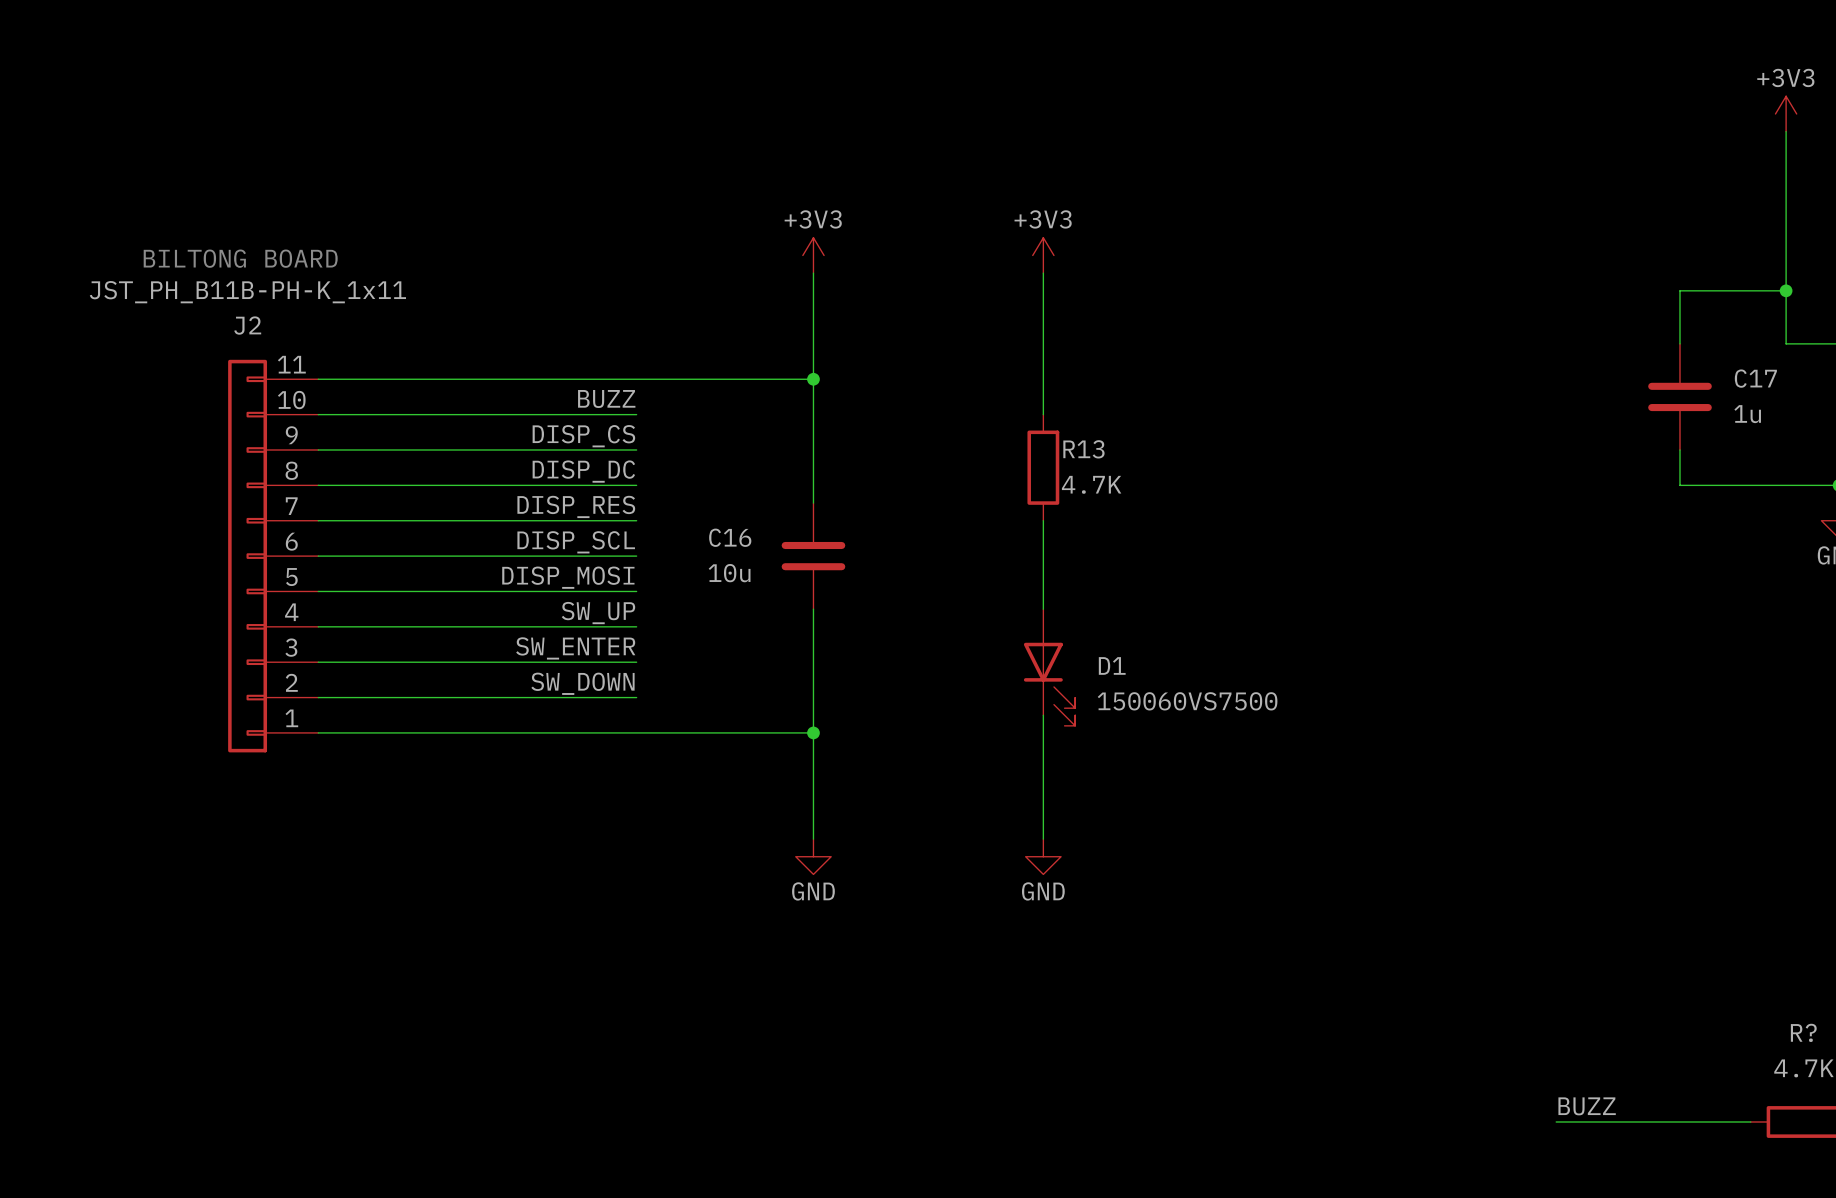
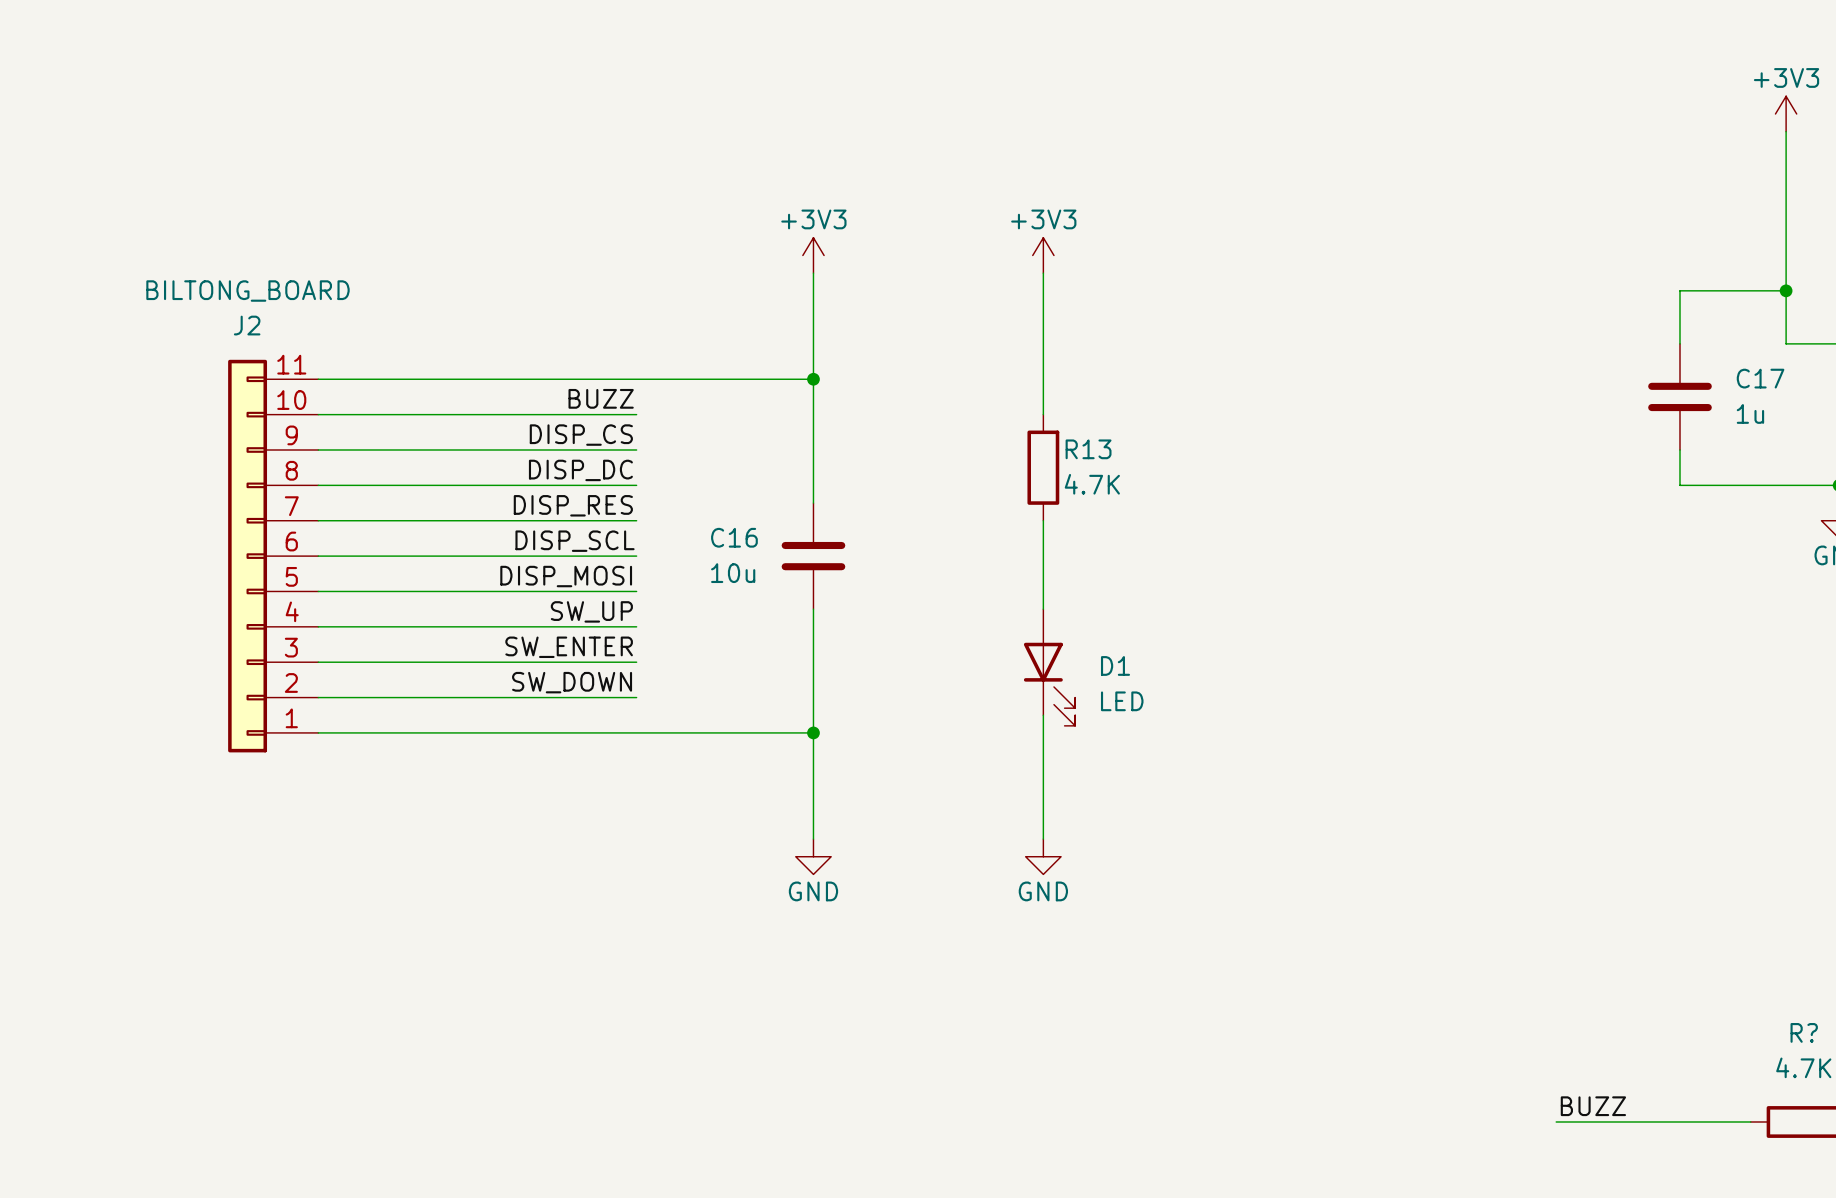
text: BILTONG BOARD (240, 258) -> none
J2 value: JST_PH_B11B-PH-K_1x11 (247, 292) -> BILTONG_BOARD (247, 291)
D1 value: 150060VS7500 (1187, 701) -> LED (1122, 701)

